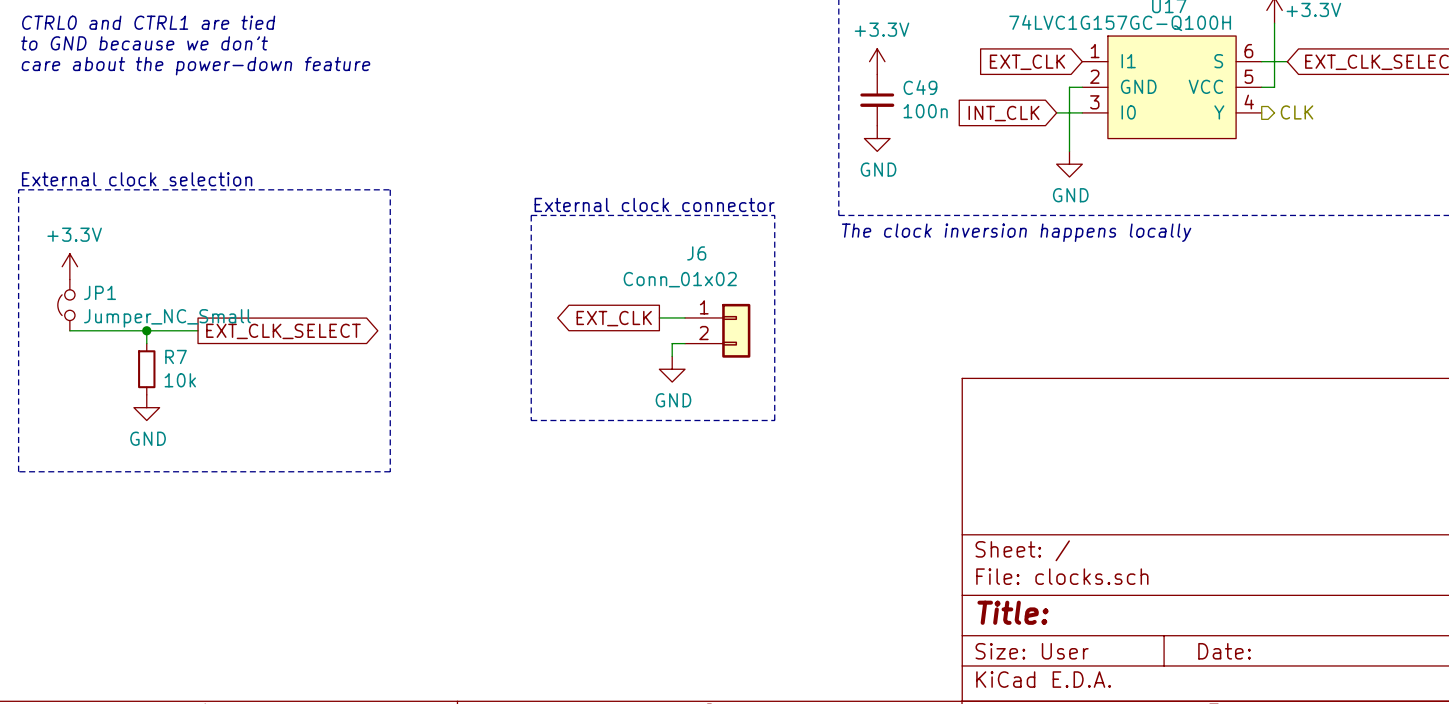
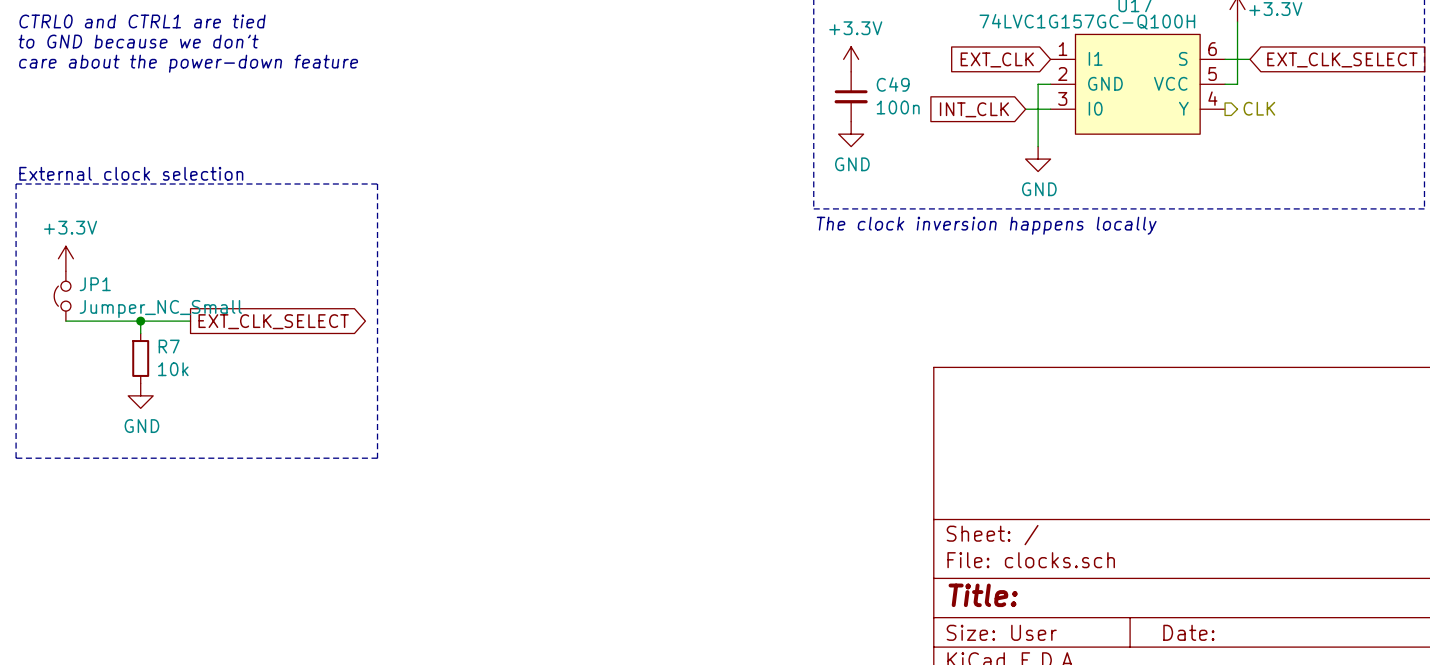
text: External clock connector (654, 204) -> none
line: (531, 215) (774, 215) (774, 420) (531, 420) (531, 215) -> none
wire: (659, 317) (685, 317) -> none
global label: EXT_CLK (614, 318) -> none
J6: Conn_01x02 (717, 330) -> none
wire: (685, 343) (672, 343) (672, 356) -> none
power symbol: GND (672, 369) -> none

